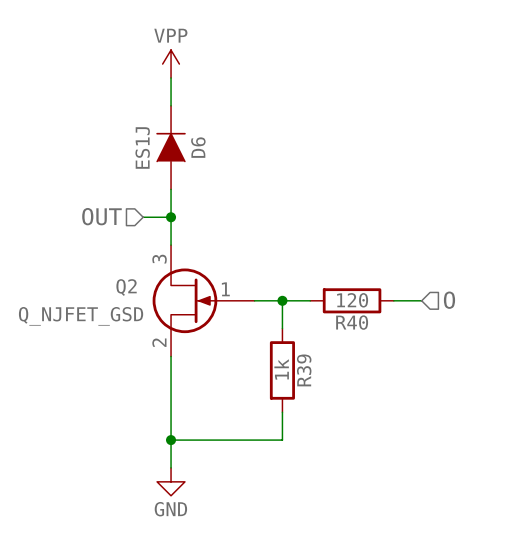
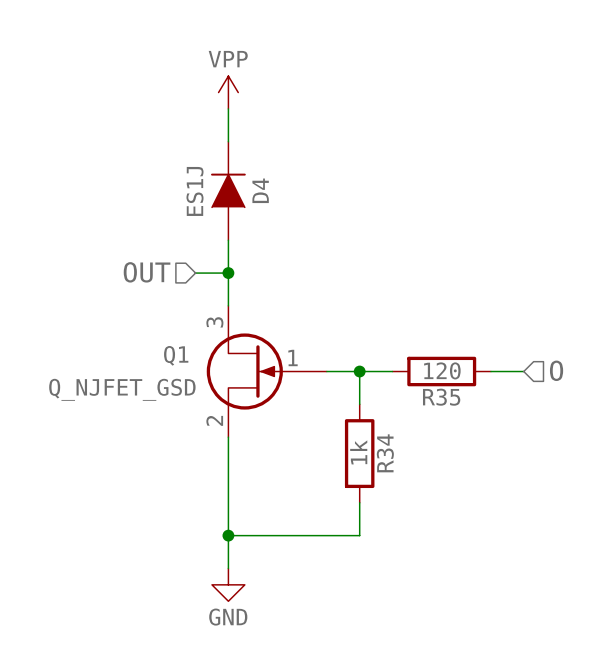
D6 name: D6 (198, 147) -> D4 (260, 190)
Q2 name: Q2 (126, 287) -> Q1 (176, 355)
R40 name: R40 (352, 322) -> R35 (441, 397)
R39 name: R39 (304, 370) -> R34 (385, 453)

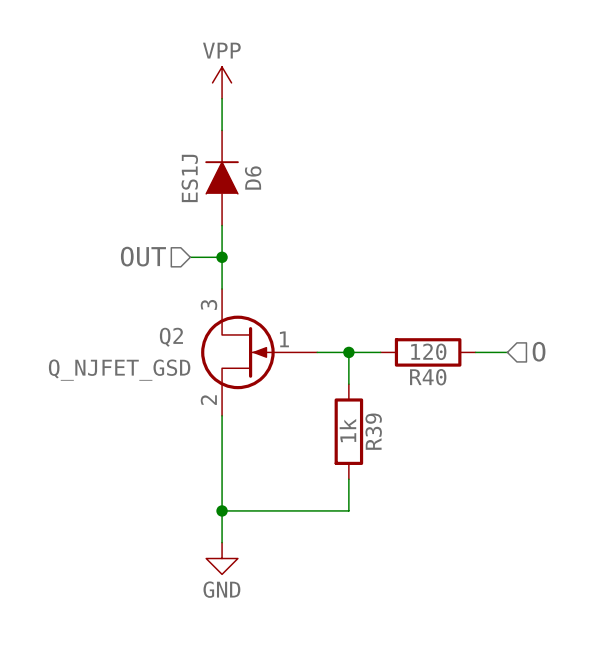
D4 name: D4 (260, 190) -> D6 (253, 178)
Q1 name: Q1 (176, 355) -> Q2 (171, 337)
R35 name: R35 (441, 397) -> R40 (428, 377)
R34 name: R34 (385, 453) -> R39 (373, 431)

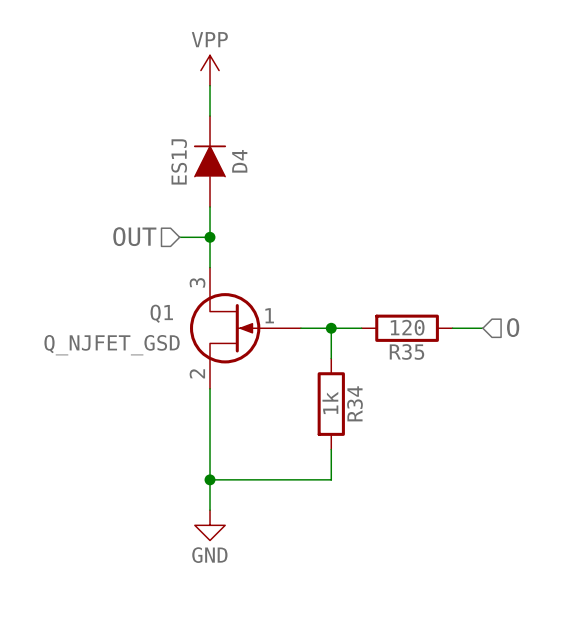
D6 name: D6 (253, 178) -> D4 (239, 161)
Q2 name: Q2 (171, 337) -> Q1 (161, 313)
R40 name: R40 (428, 377) -> R35 (406, 351)
R39 name: R39 (373, 431) -> R34 (354, 403)

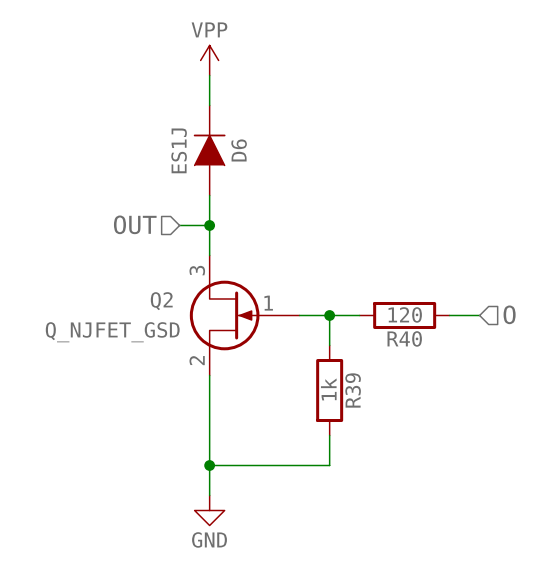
D4 name: D4 (239, 161) -> D6 (239, 150)
Q1 name: Q1 (161, 313) -> Q2 (161, 301)
R35 name: R35 (406, 351) -> R40 (404, 338)
R34 name: R34 (354, 403) -> R39 (353, 390)

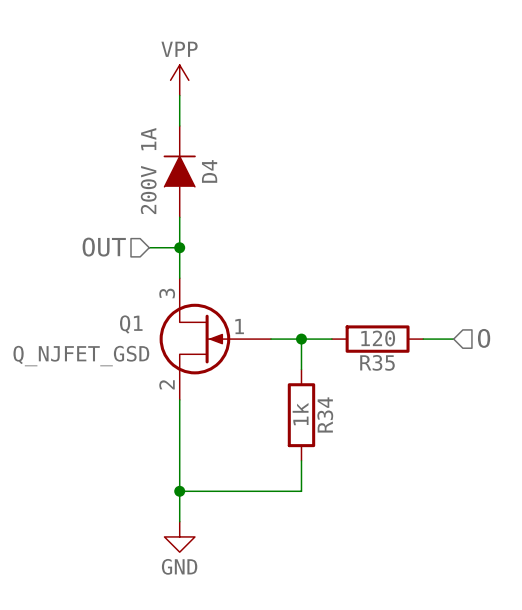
D6 value: ES1J (179, 150) -> 200V 1A (148, 171)
D6 name: D6 (239, 150) -> D4 (209, 171)
Q2 name: Q2 (161, 301) -> Q1 (131, 324)
R40 name: R40 (404, 338) -> R35 (377, 362)
R39 name: R39 (353, 390) -> R34 (325, 414)

